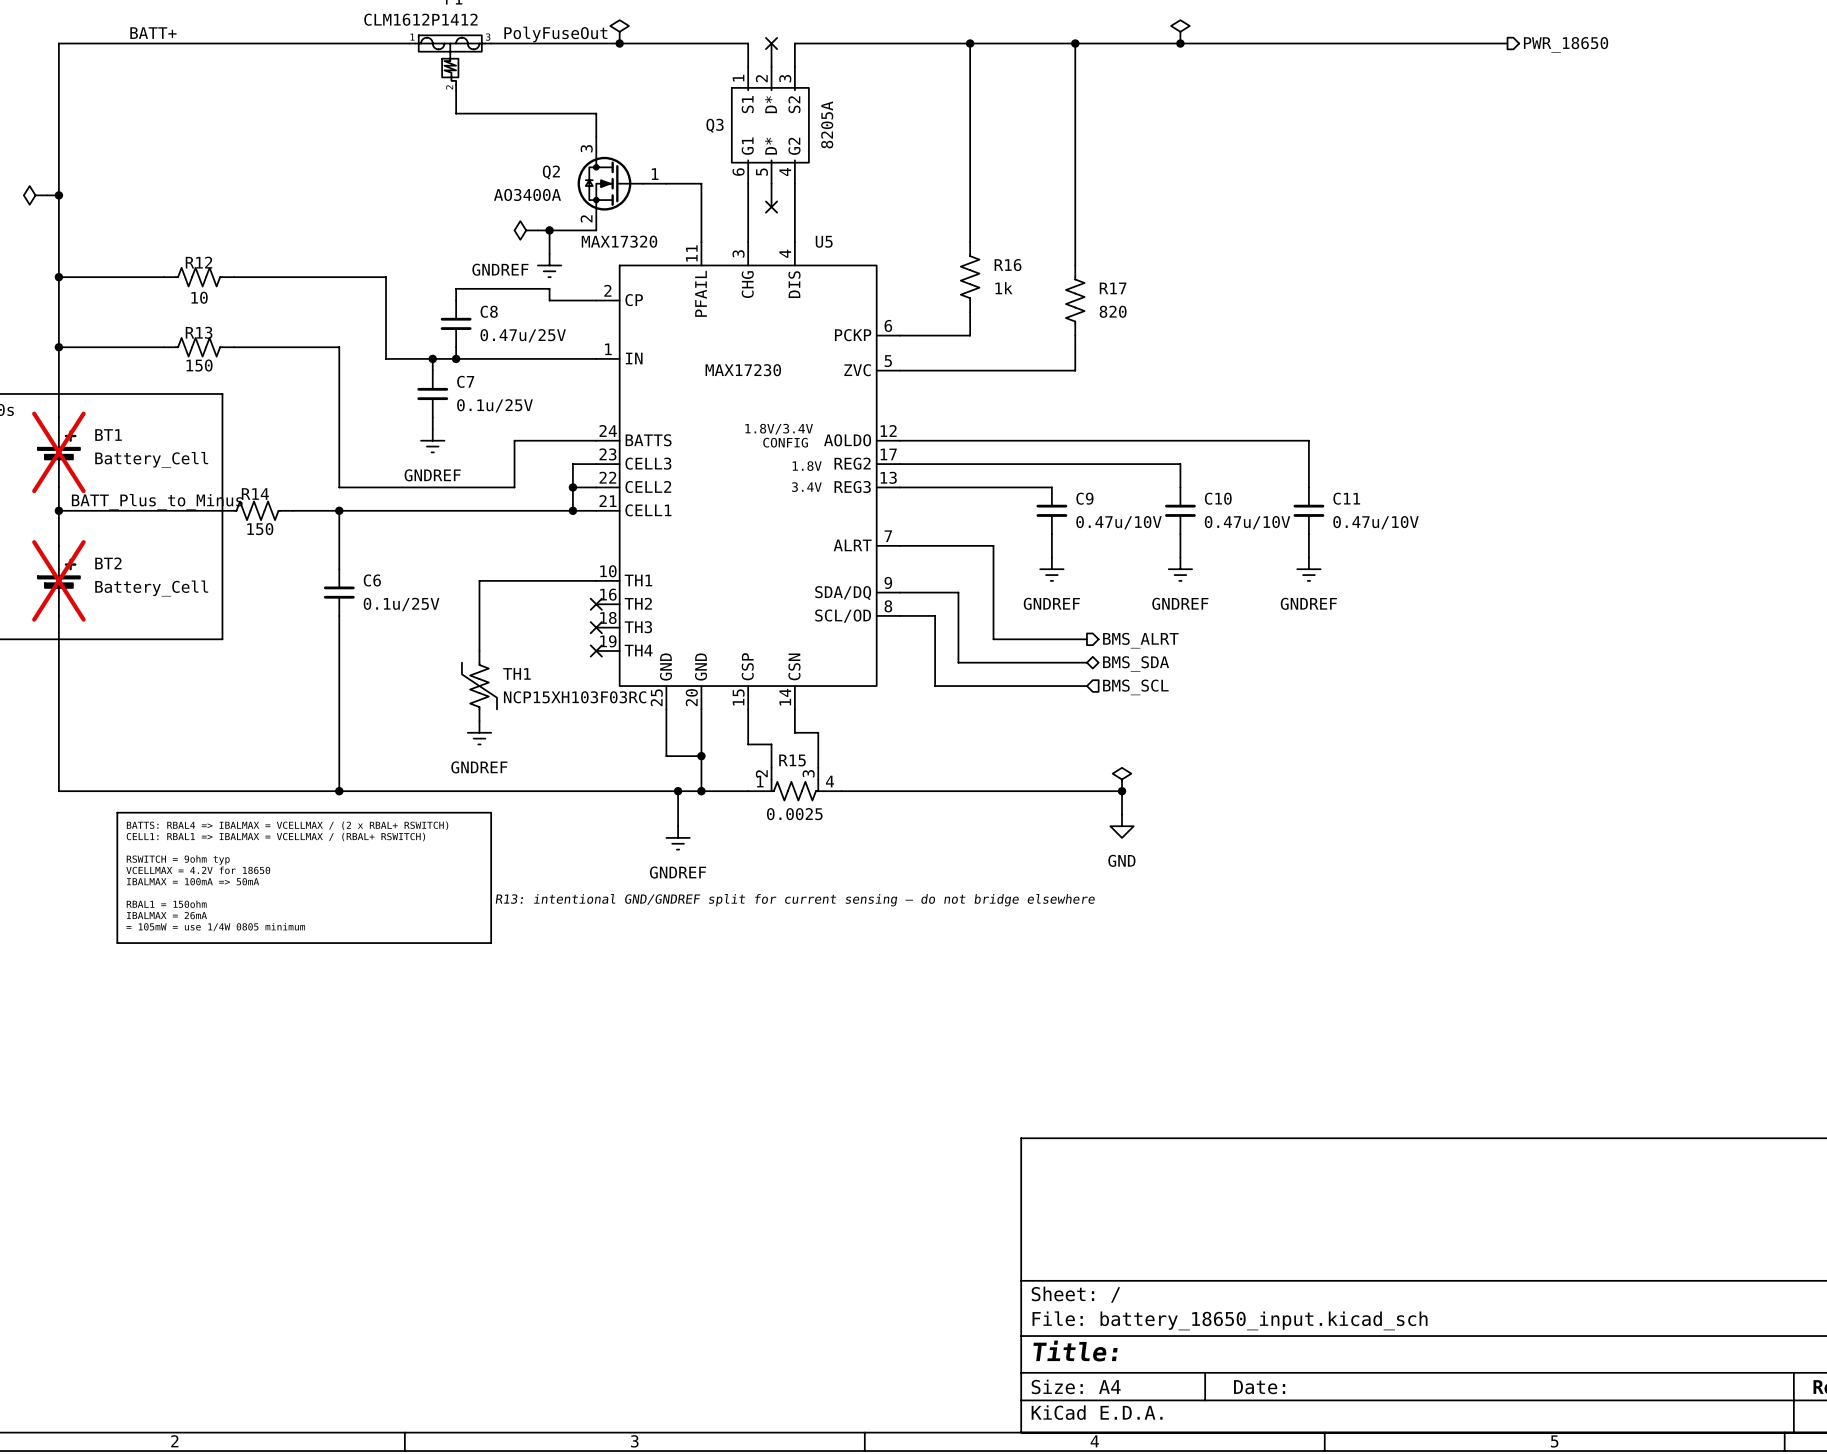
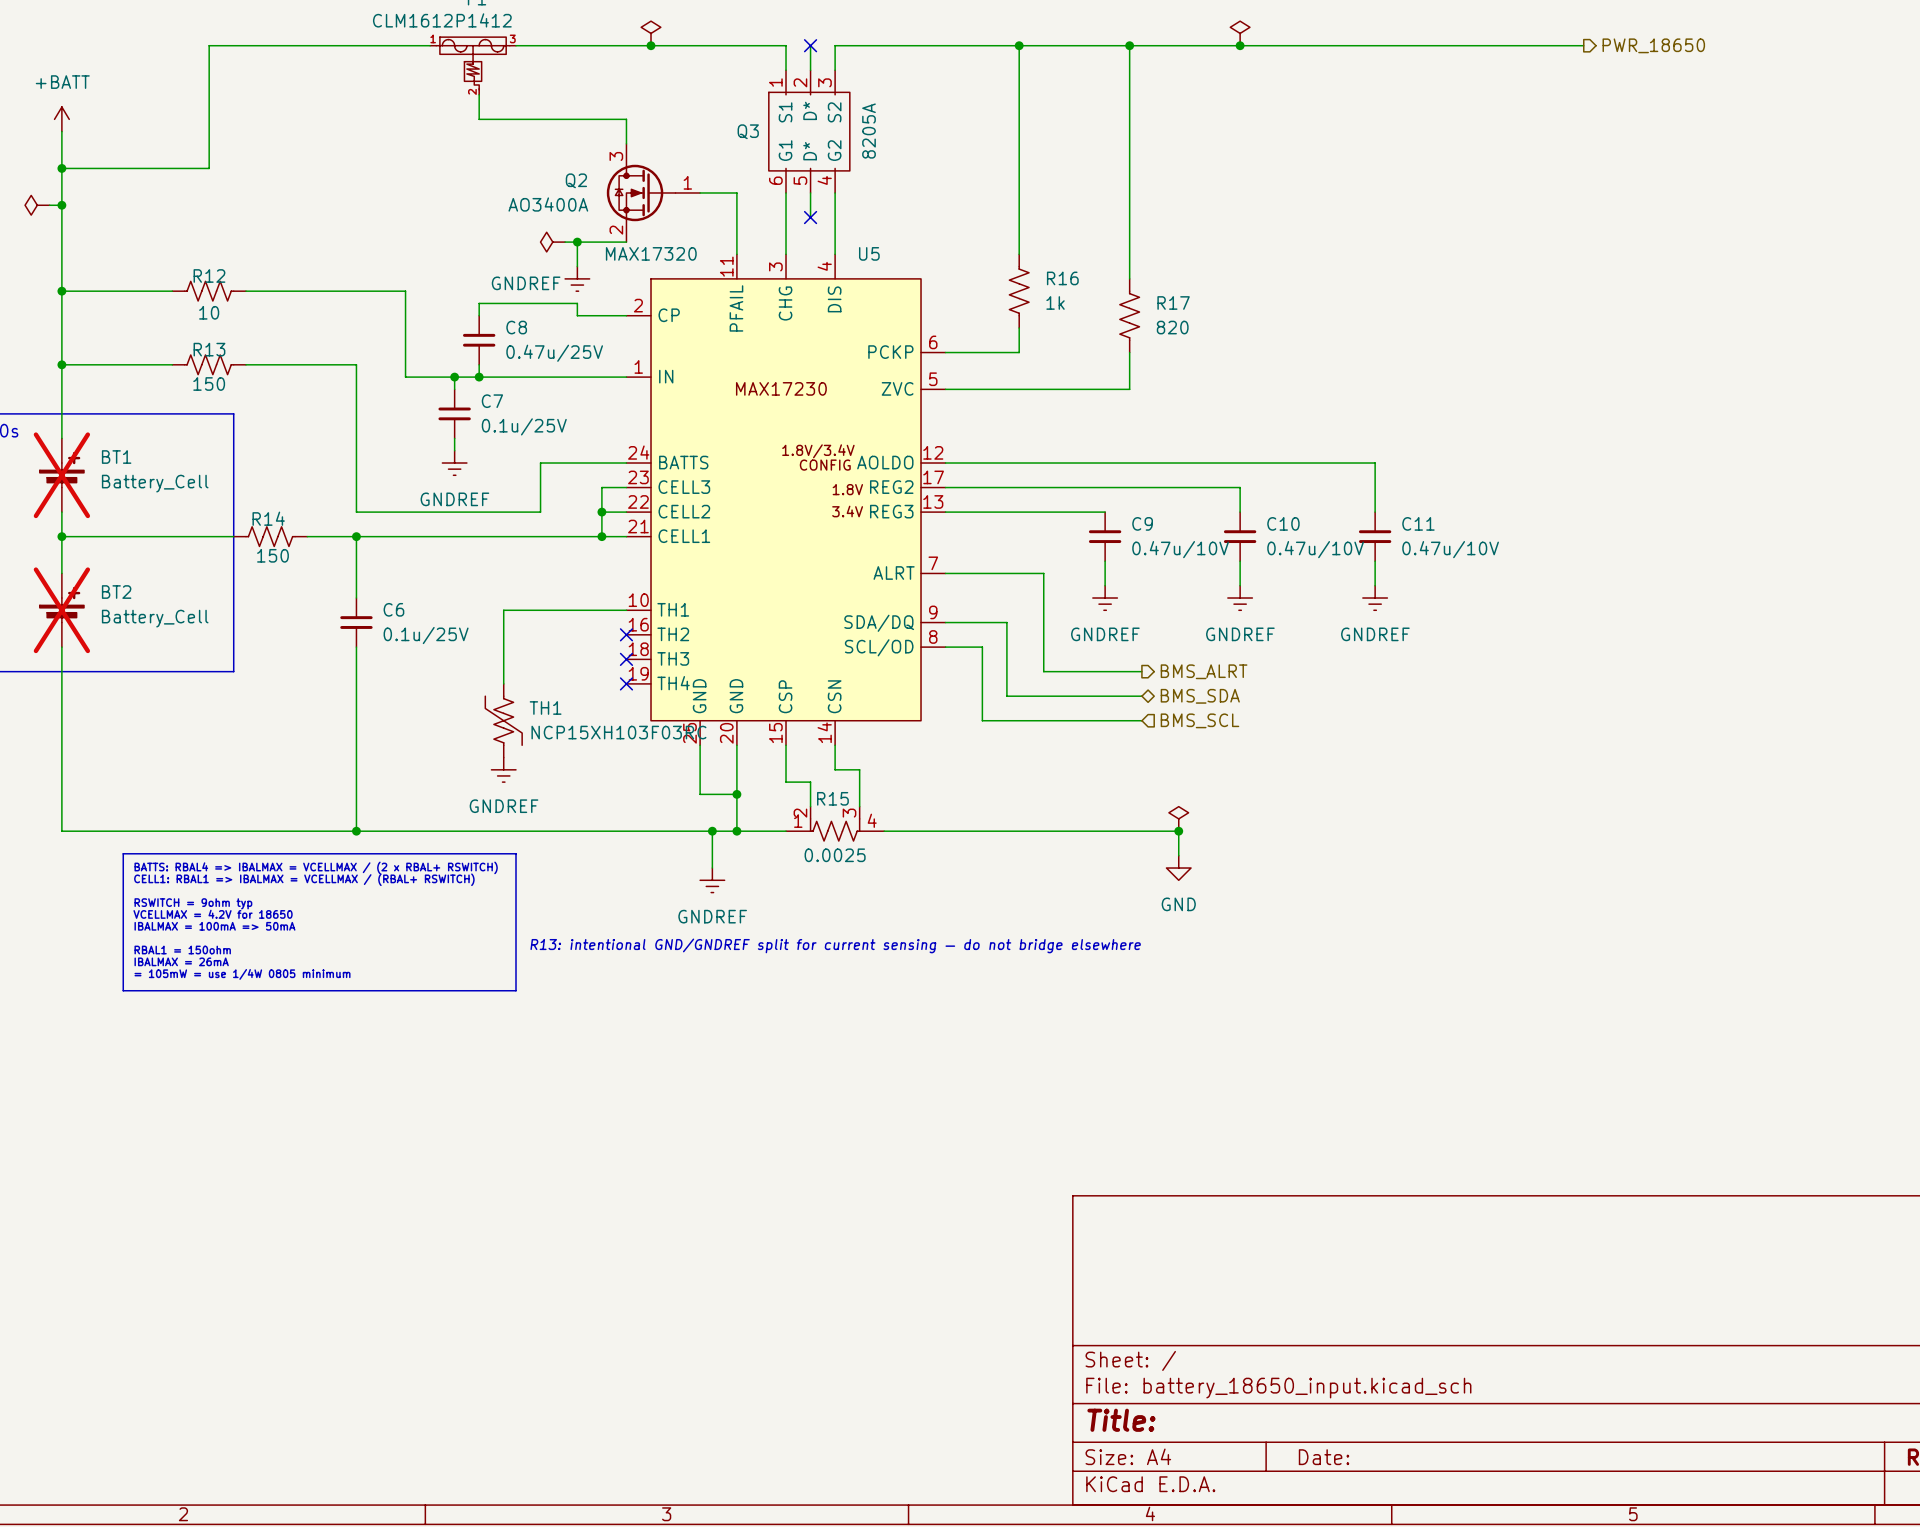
label: BATT+ (153, 33) -> none
label: PolyFuseOut (555, 34) -> none
wire: (199, 43) (58, 43) (58, 125) -> (209, 45) (209, 168) (61, 168)
power symbol: none -> +BATT (61, 119)
junction: none -> (61, 168)
label: BATT_Plus_to_Minus (157, 501) -> none

